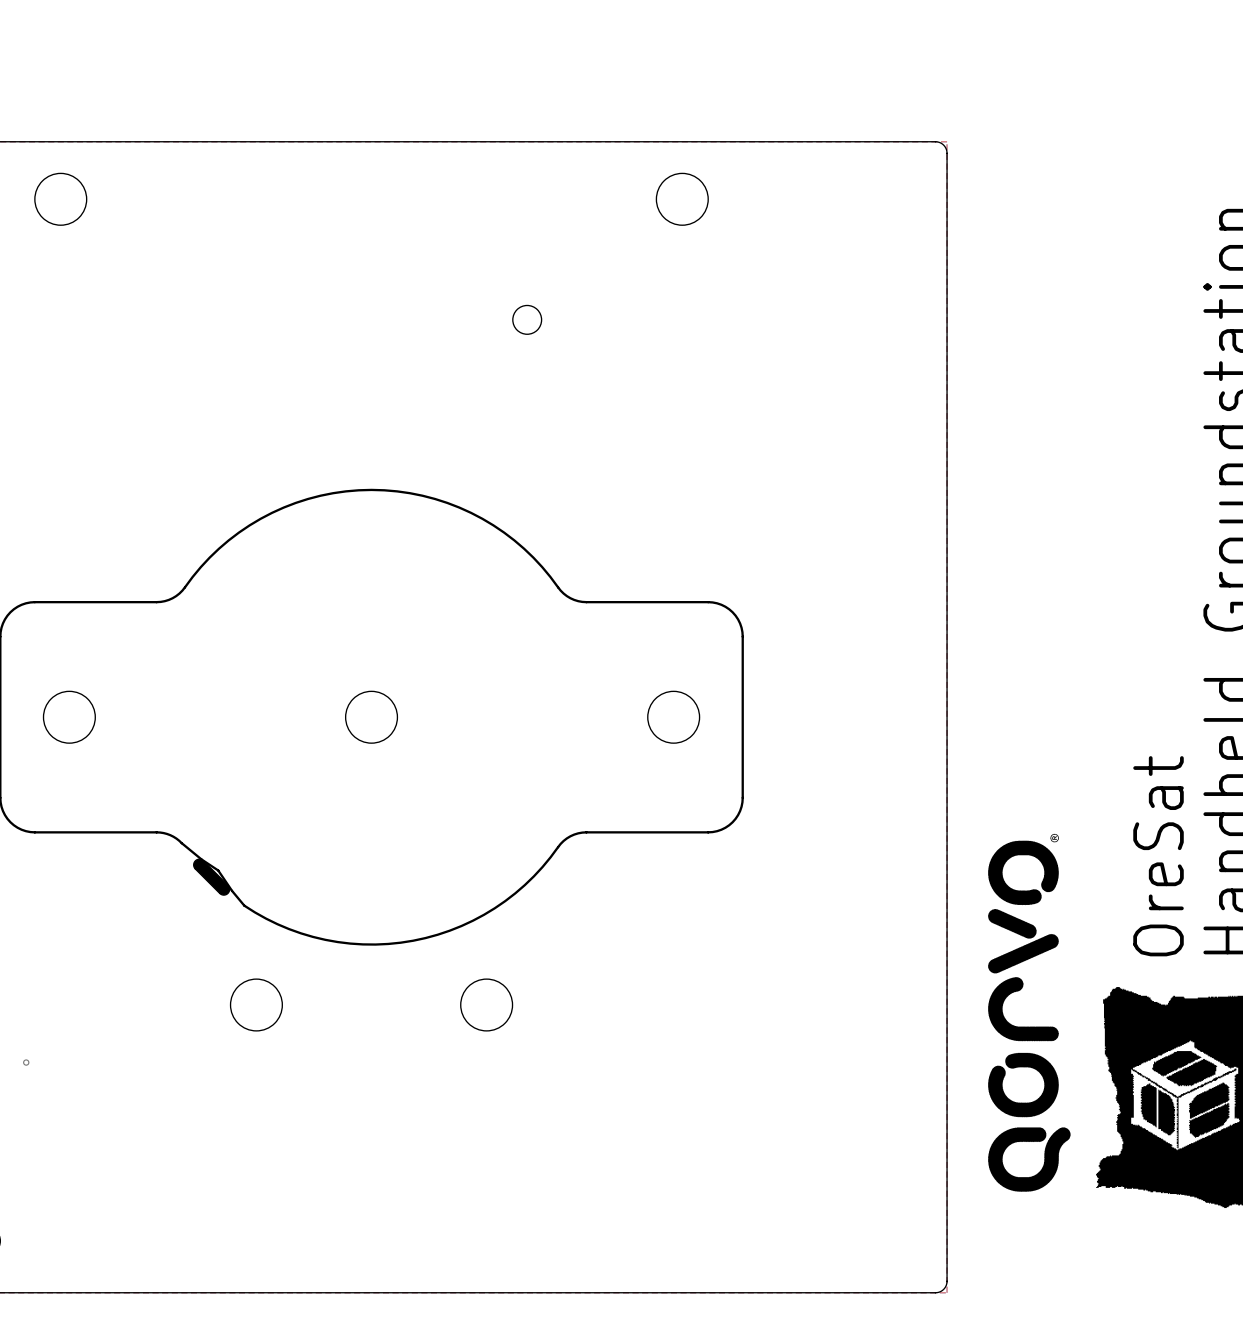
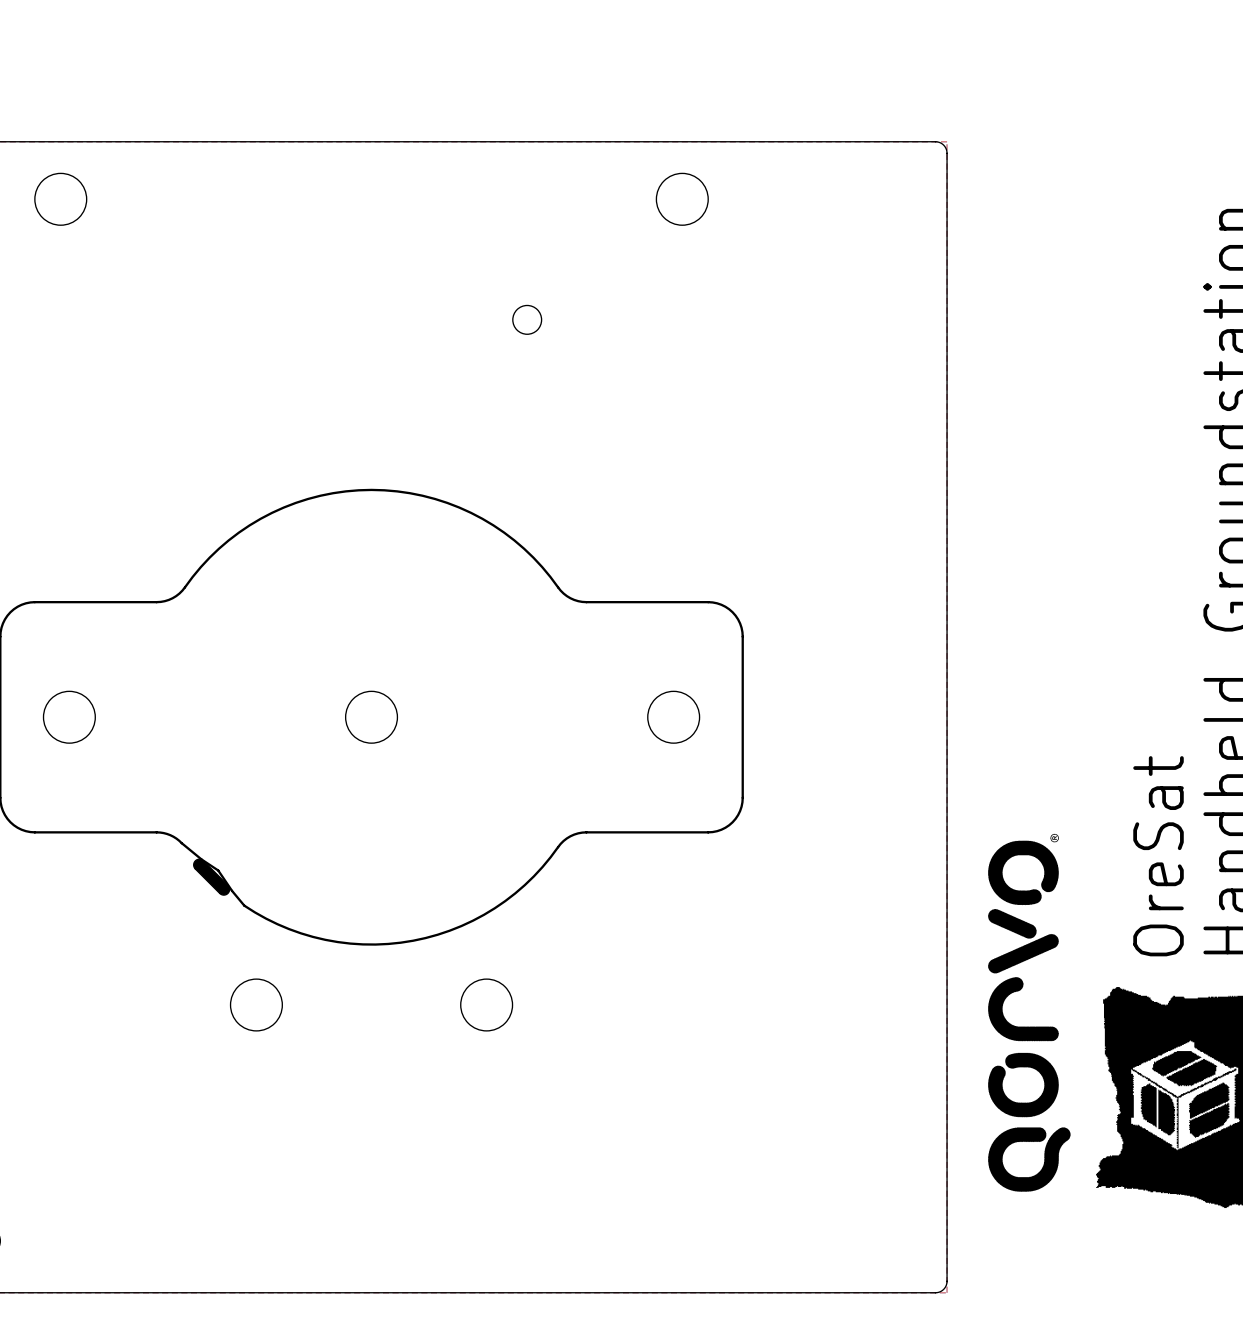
via: (26, 1062) -> none

